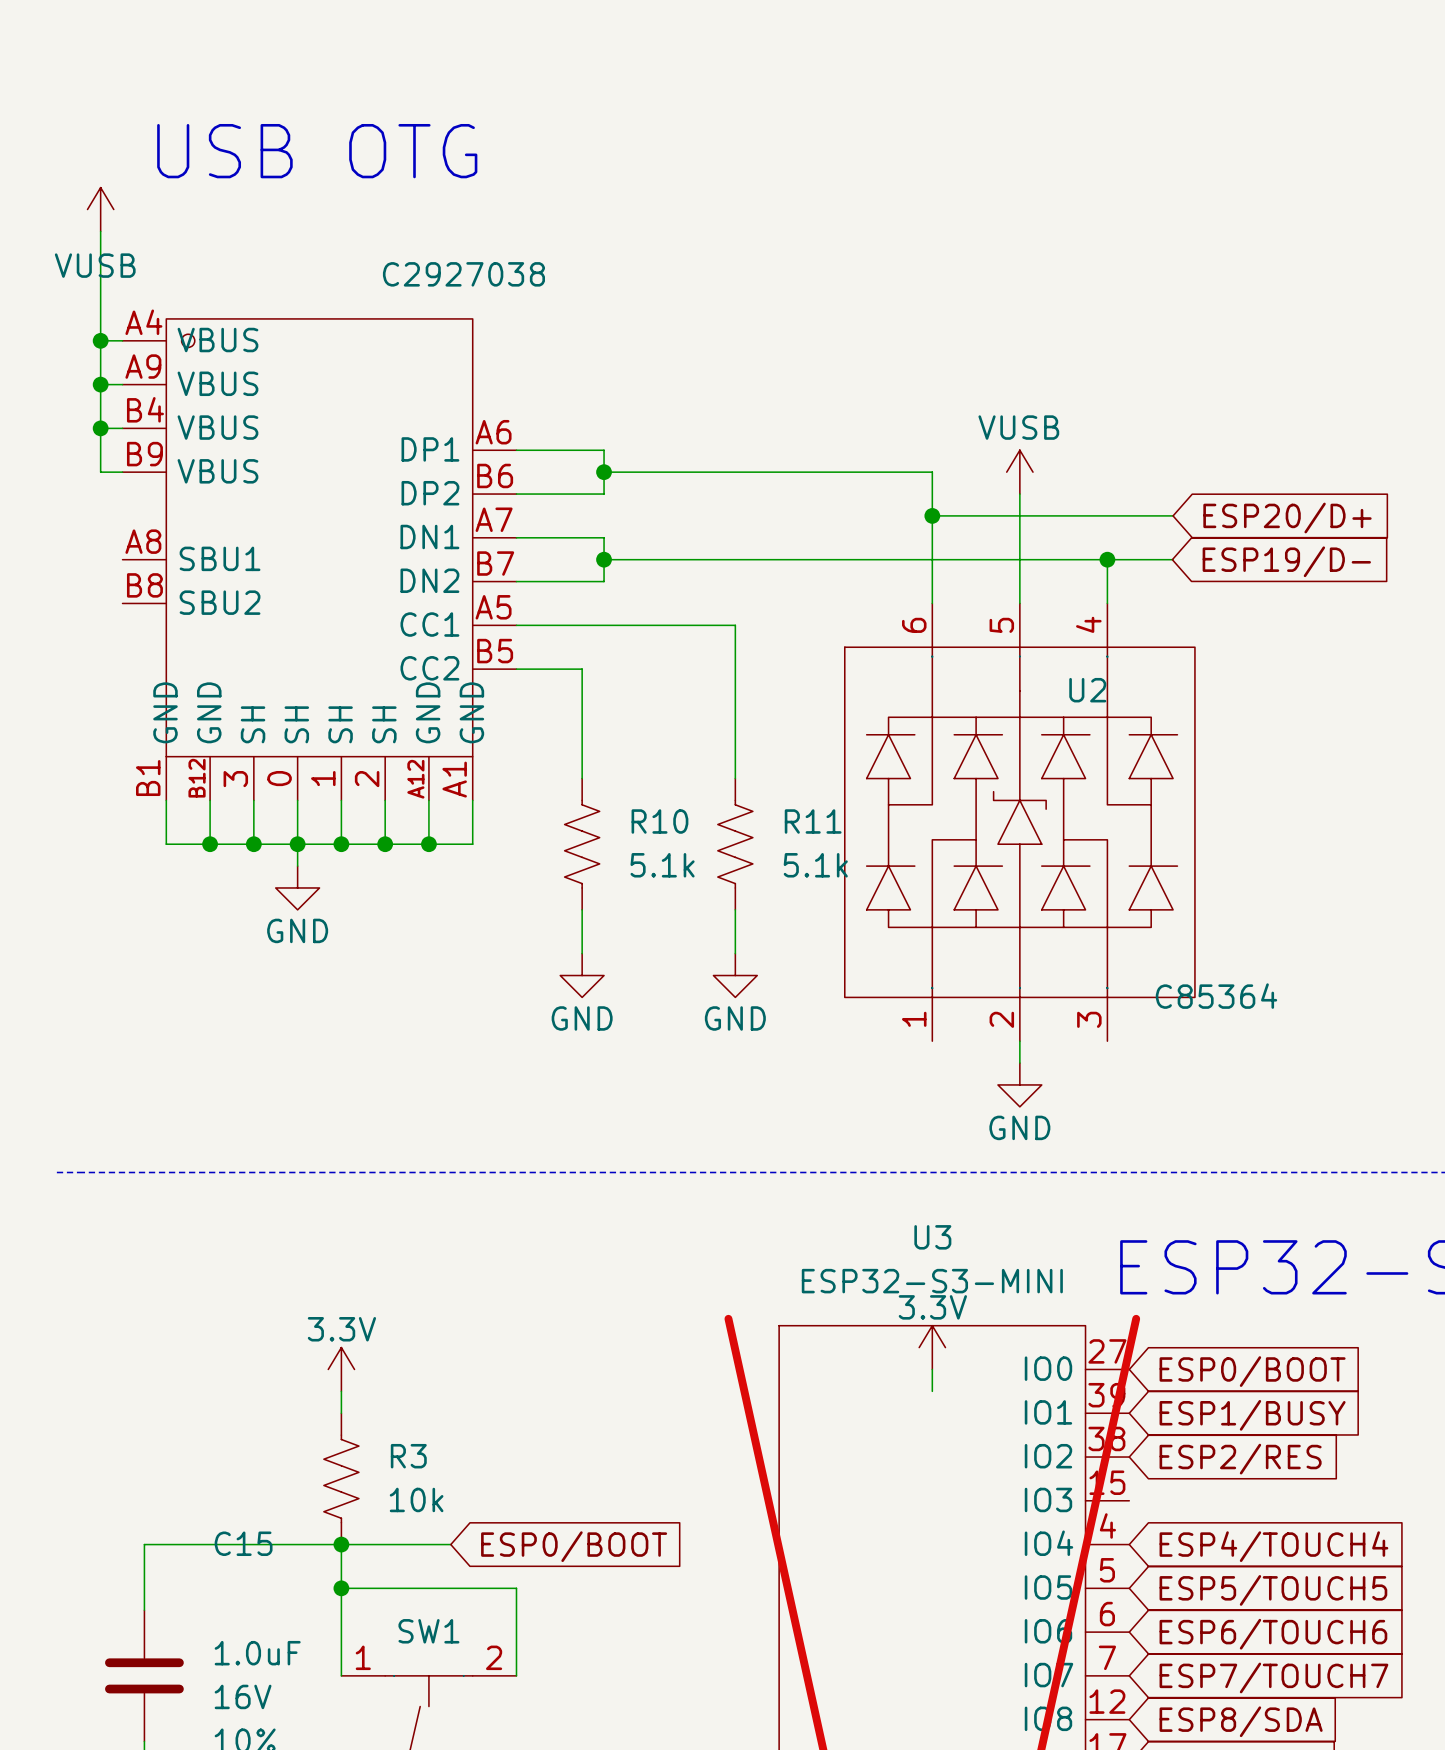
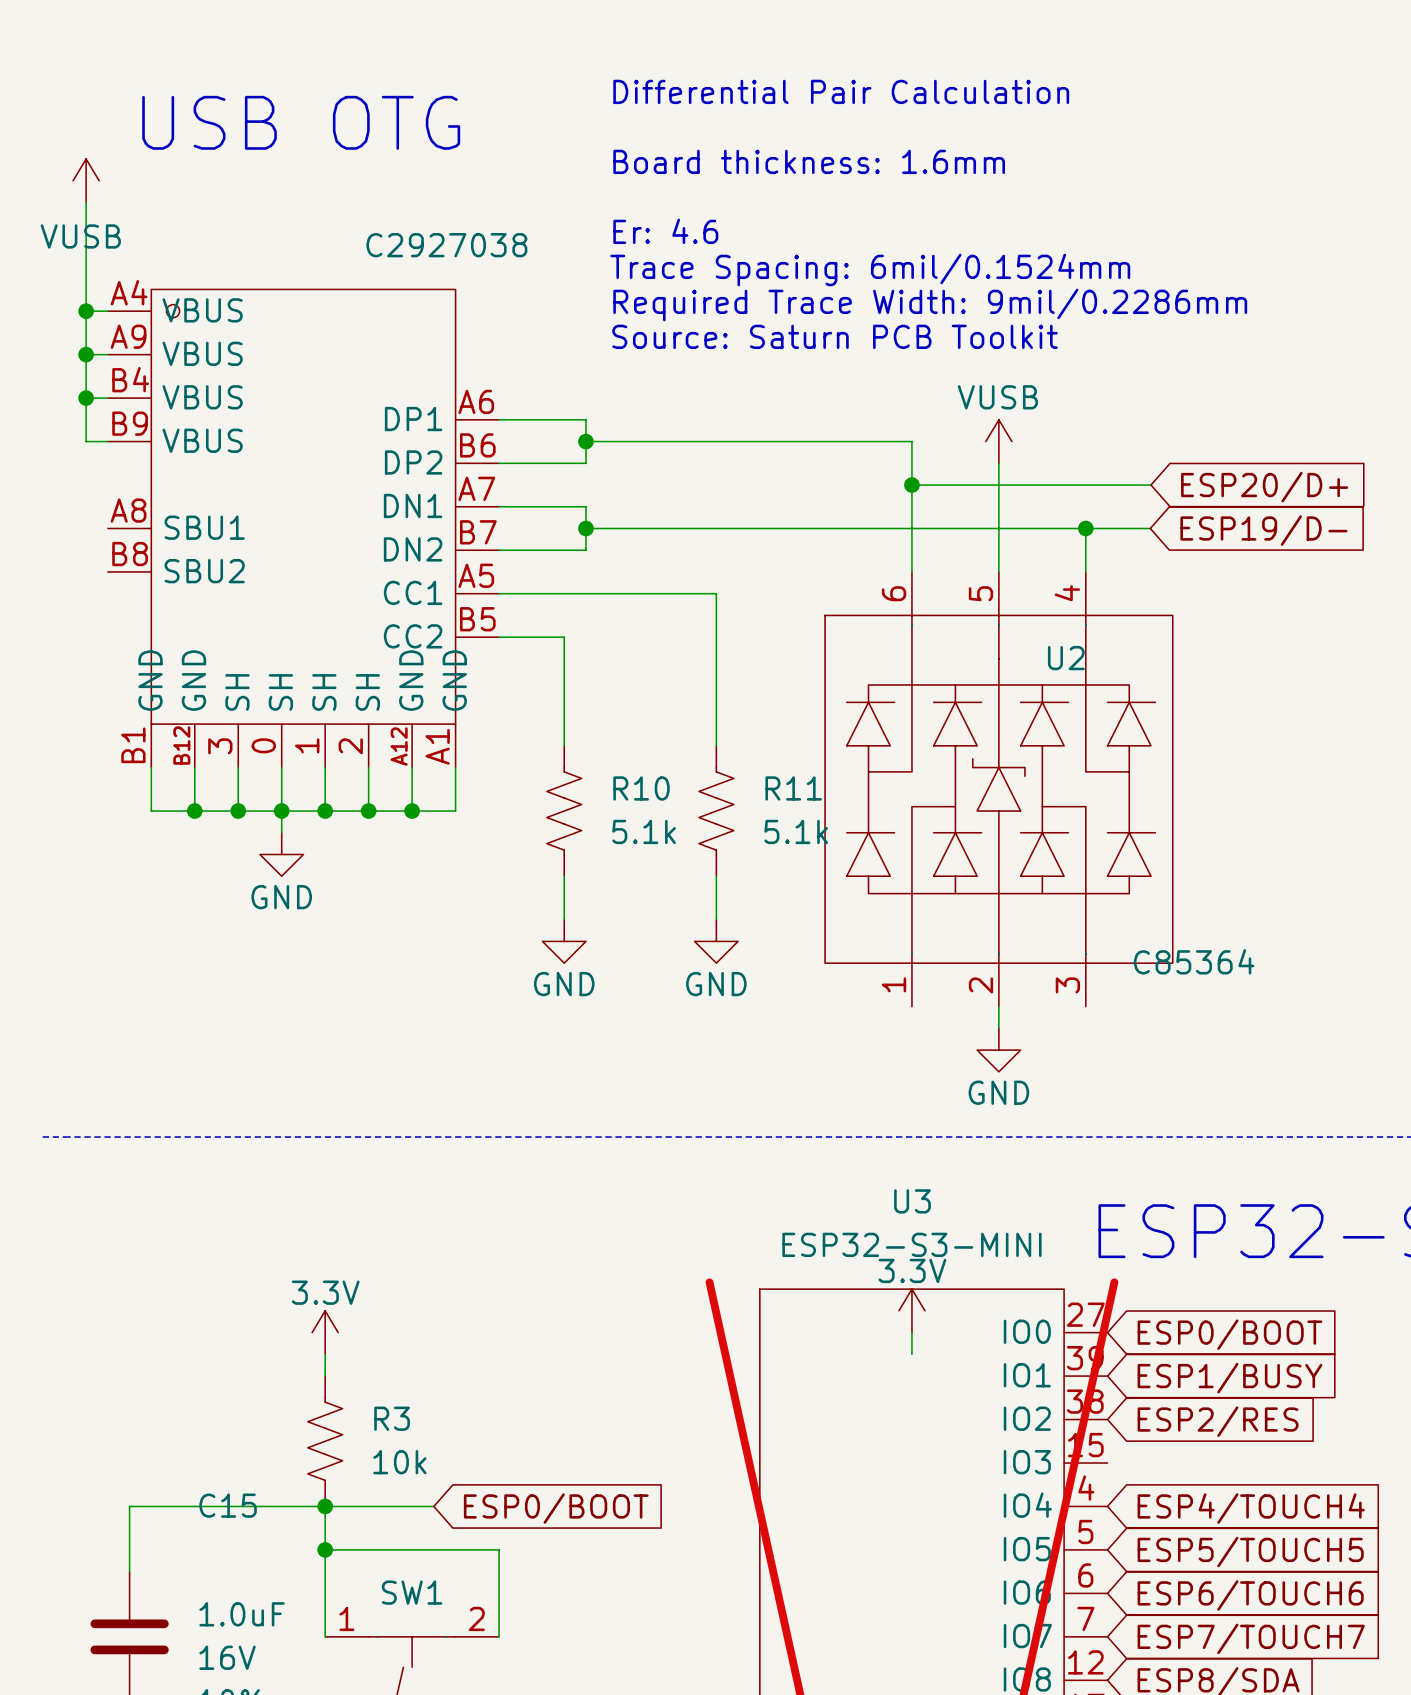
text: none -> Differential Pair Calculation (841, 91)
text: none -> Board thickness: 1.6mm (809, 161)
text: none -> Er: 4.6 (665, 231)
text: none -> Trace Spacing: 6mil/0.1524mm (870, 269)
text: none -> Required Trace Width: 9mil/0.2286mm (930, 304)
text: none -> Source: Saturn PCB Toolkit (835, 336)

